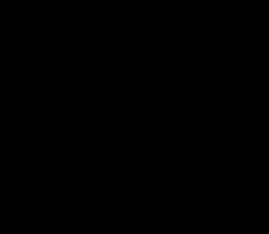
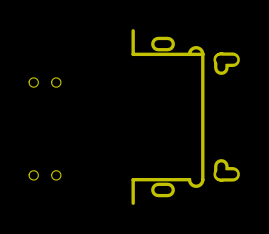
part: none -> (45, 82)
part: none -> (185, 117)
part: none -> (45, 175)

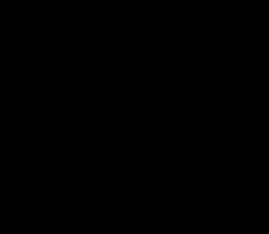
part: (45, 82) -> none
part: (185, 117) -> none
part: (45, 175) -> none

